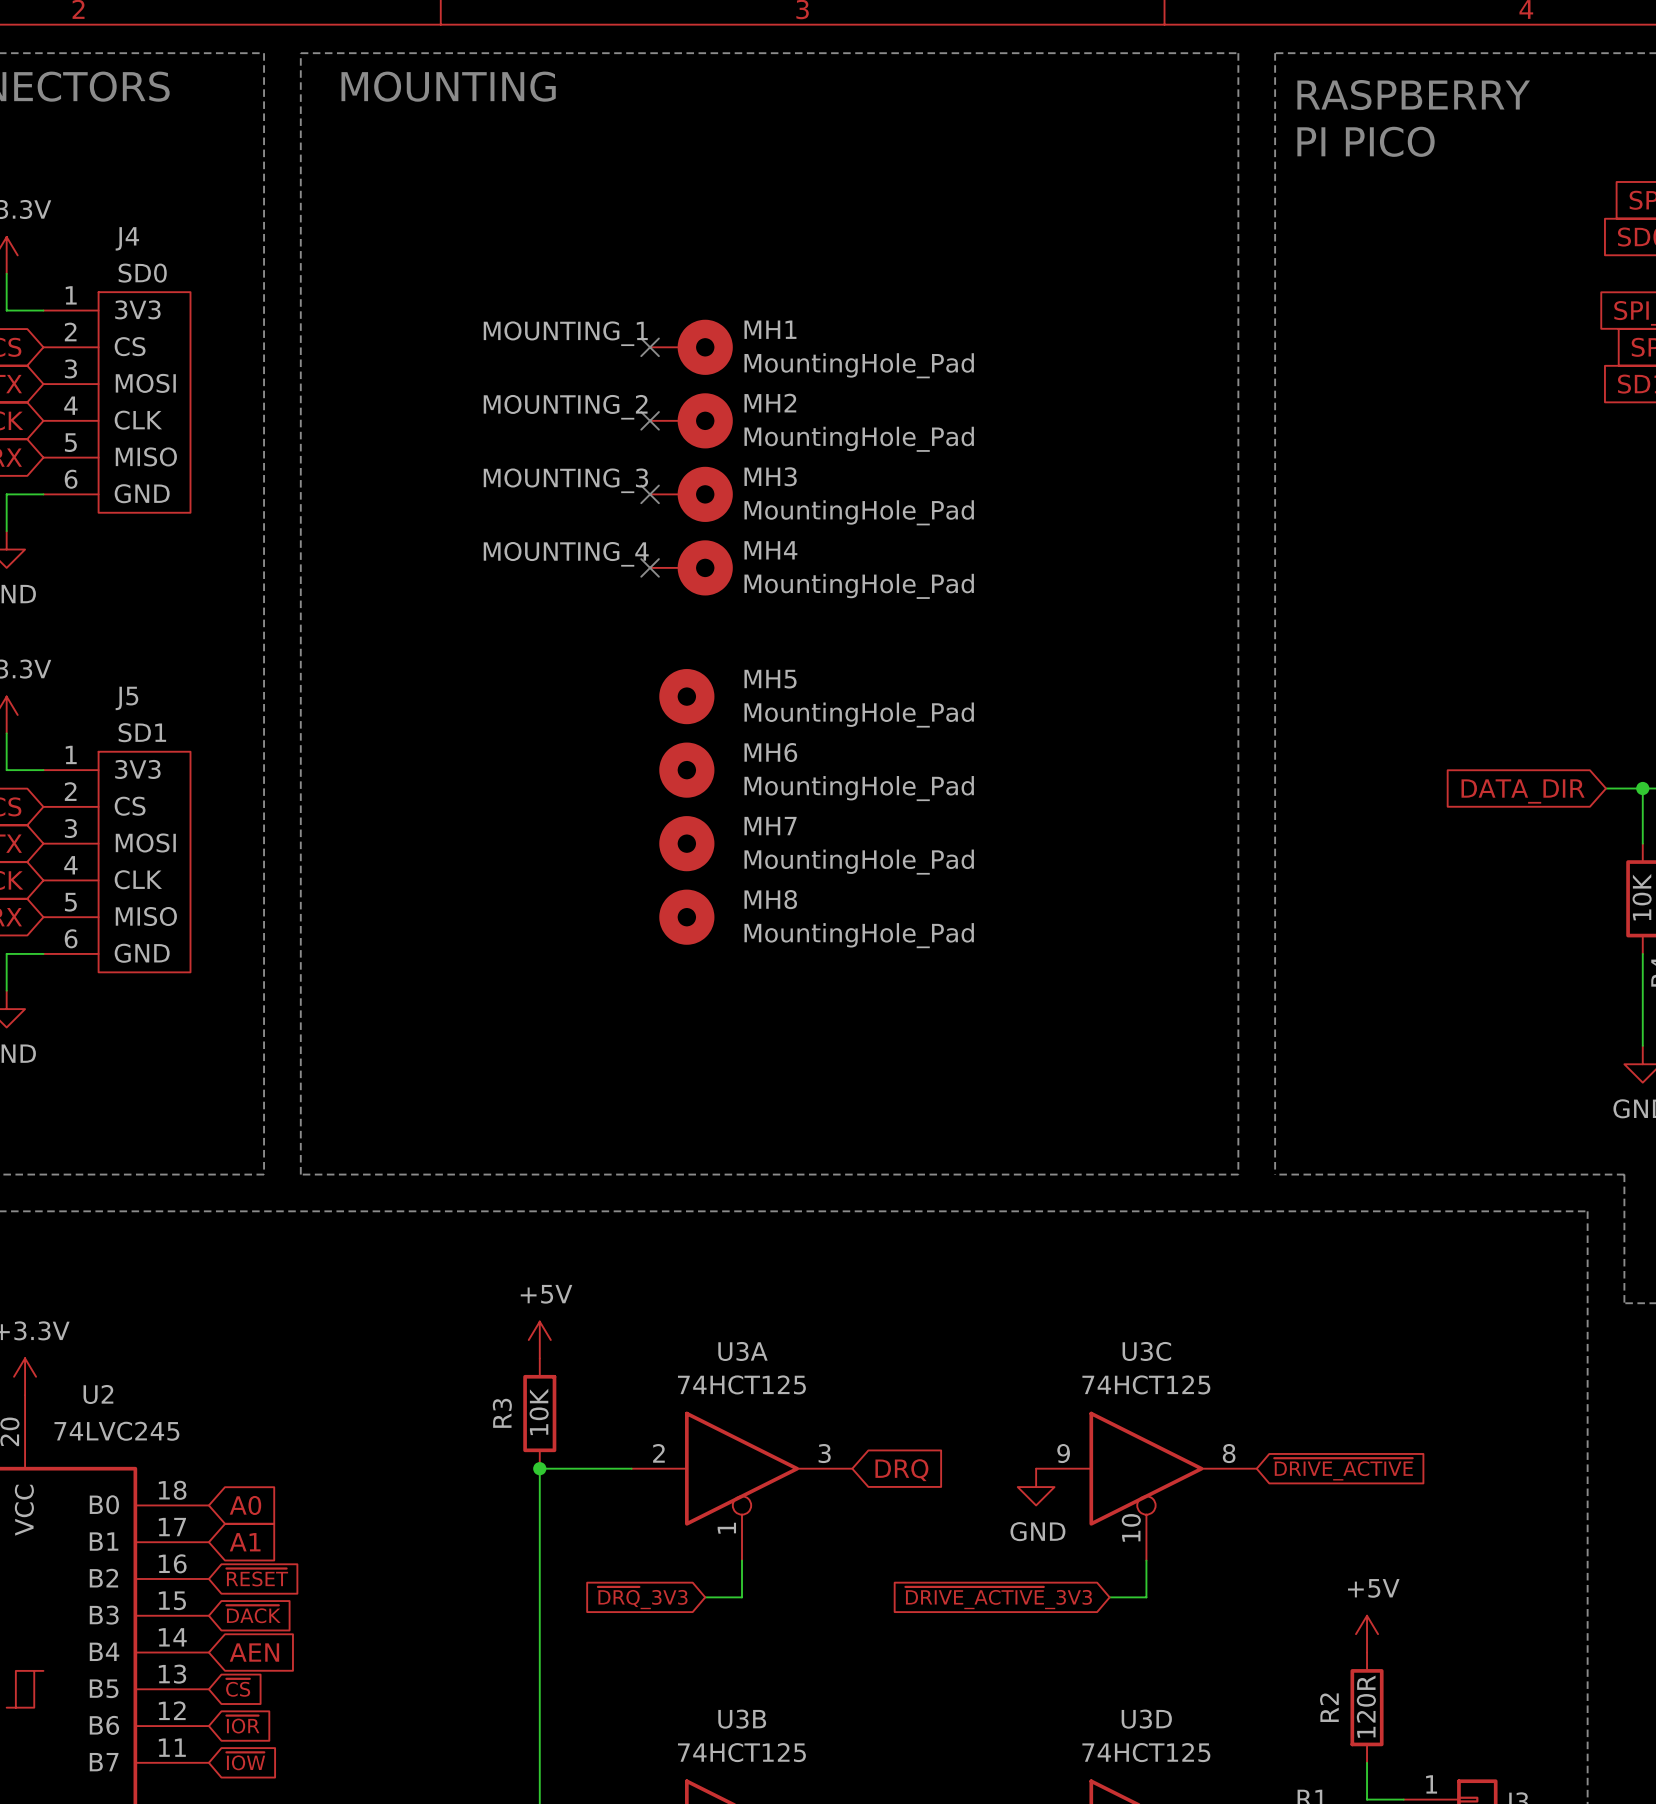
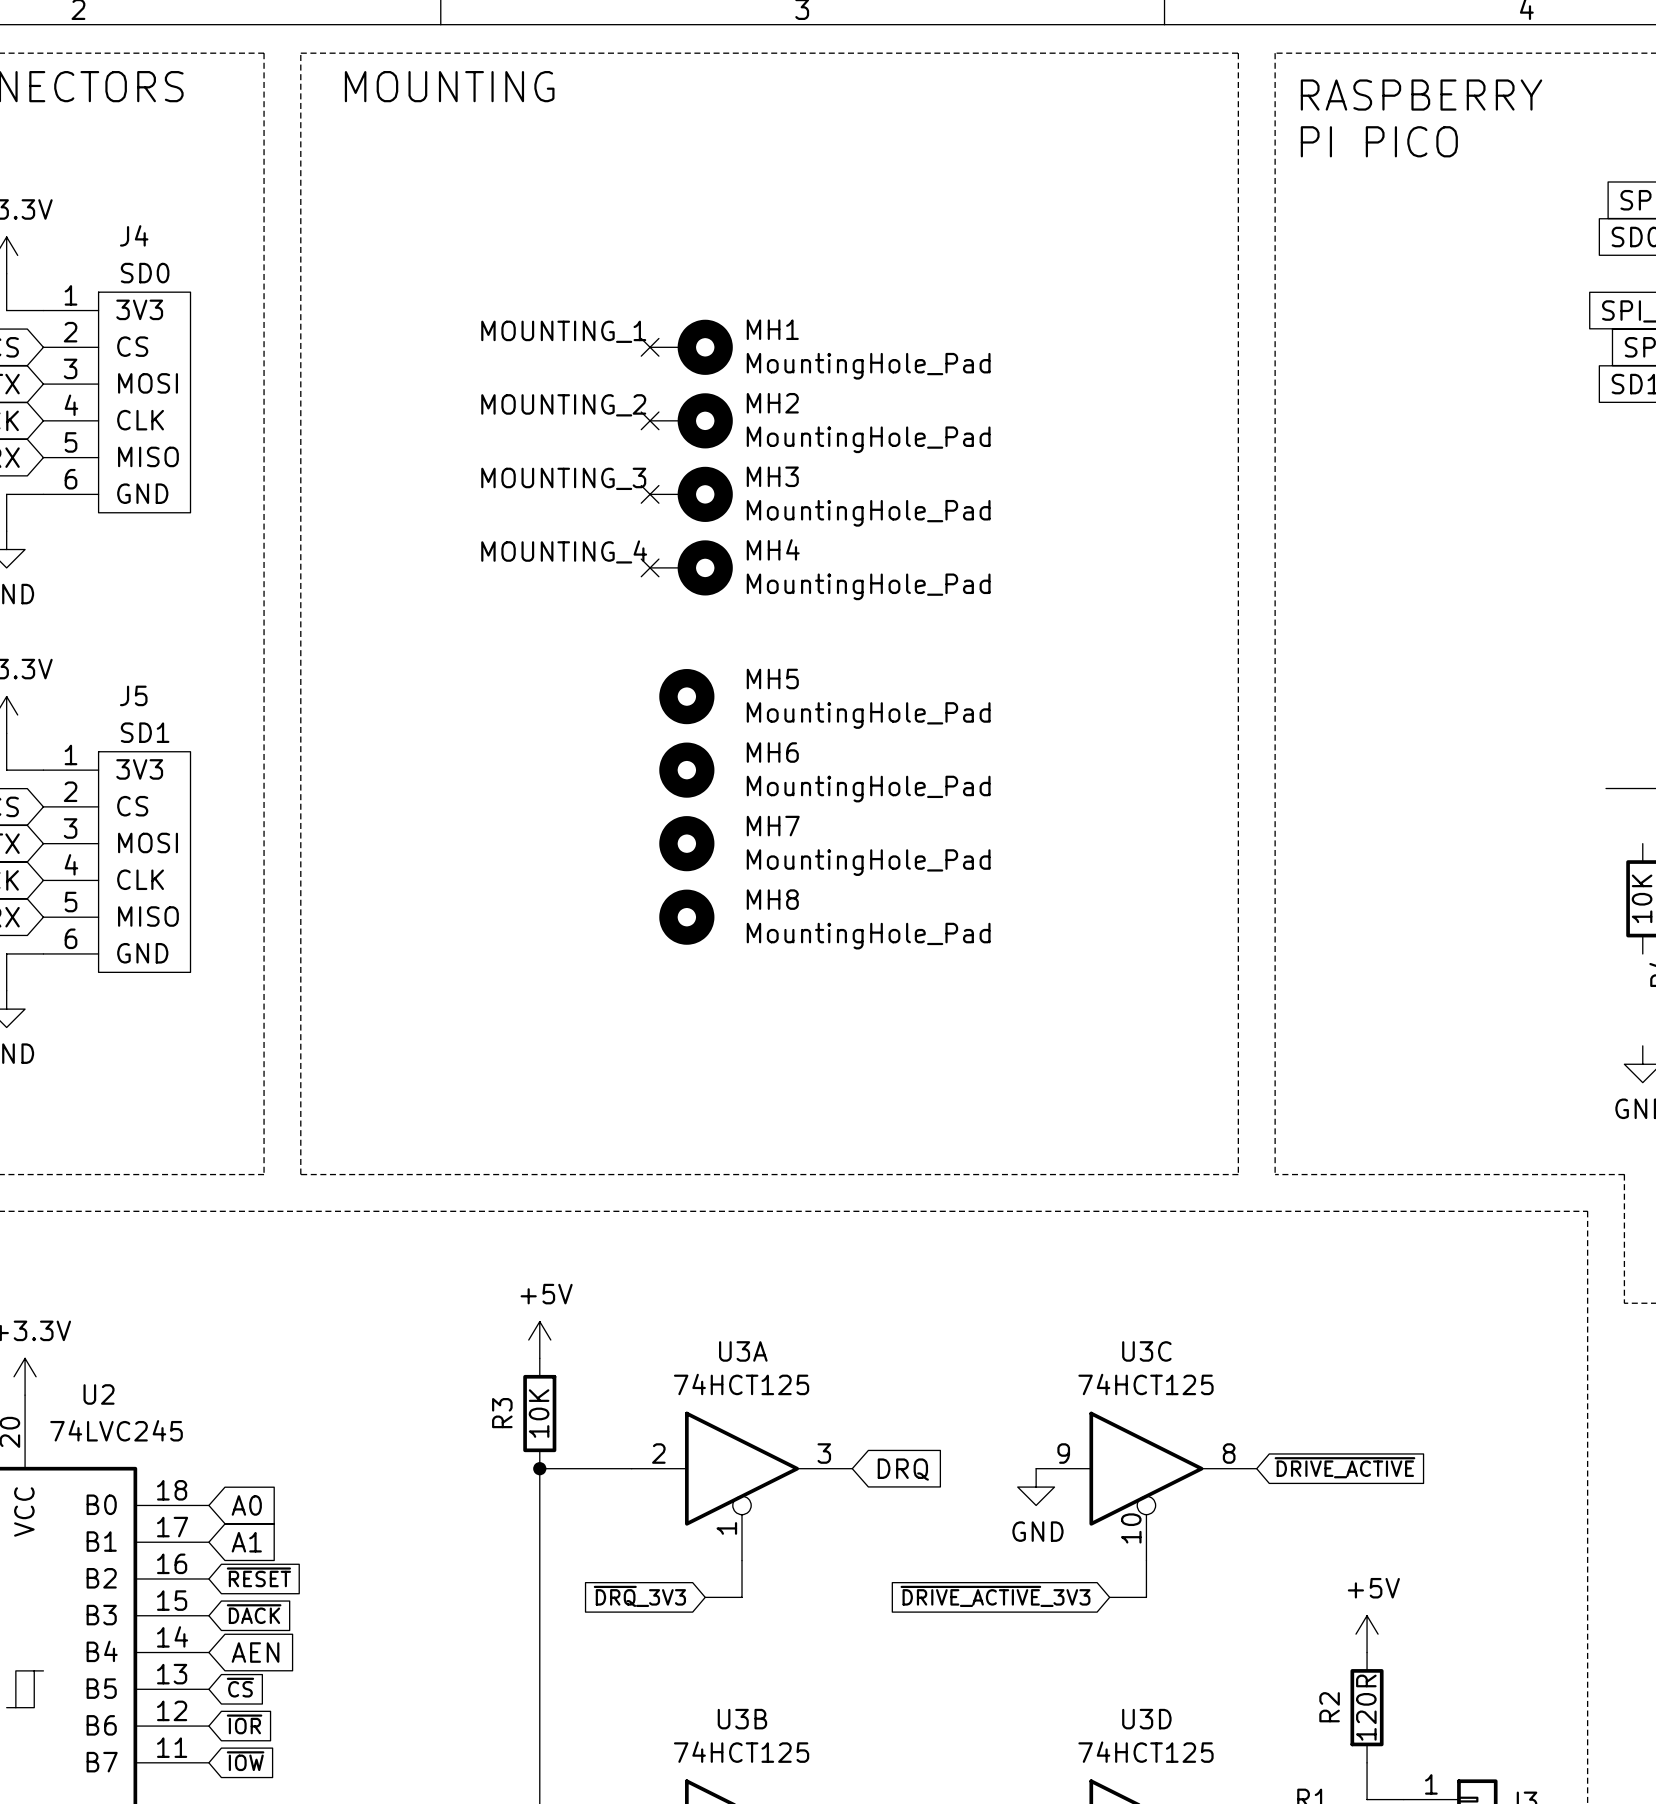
wire: (1642, 788) (1642, 843) -> none
junction: (1642, 788) -> none
global label: DATA_DIR (1523, 791) -> none
wire: (1642, 953) (1642, 1045) -> none

